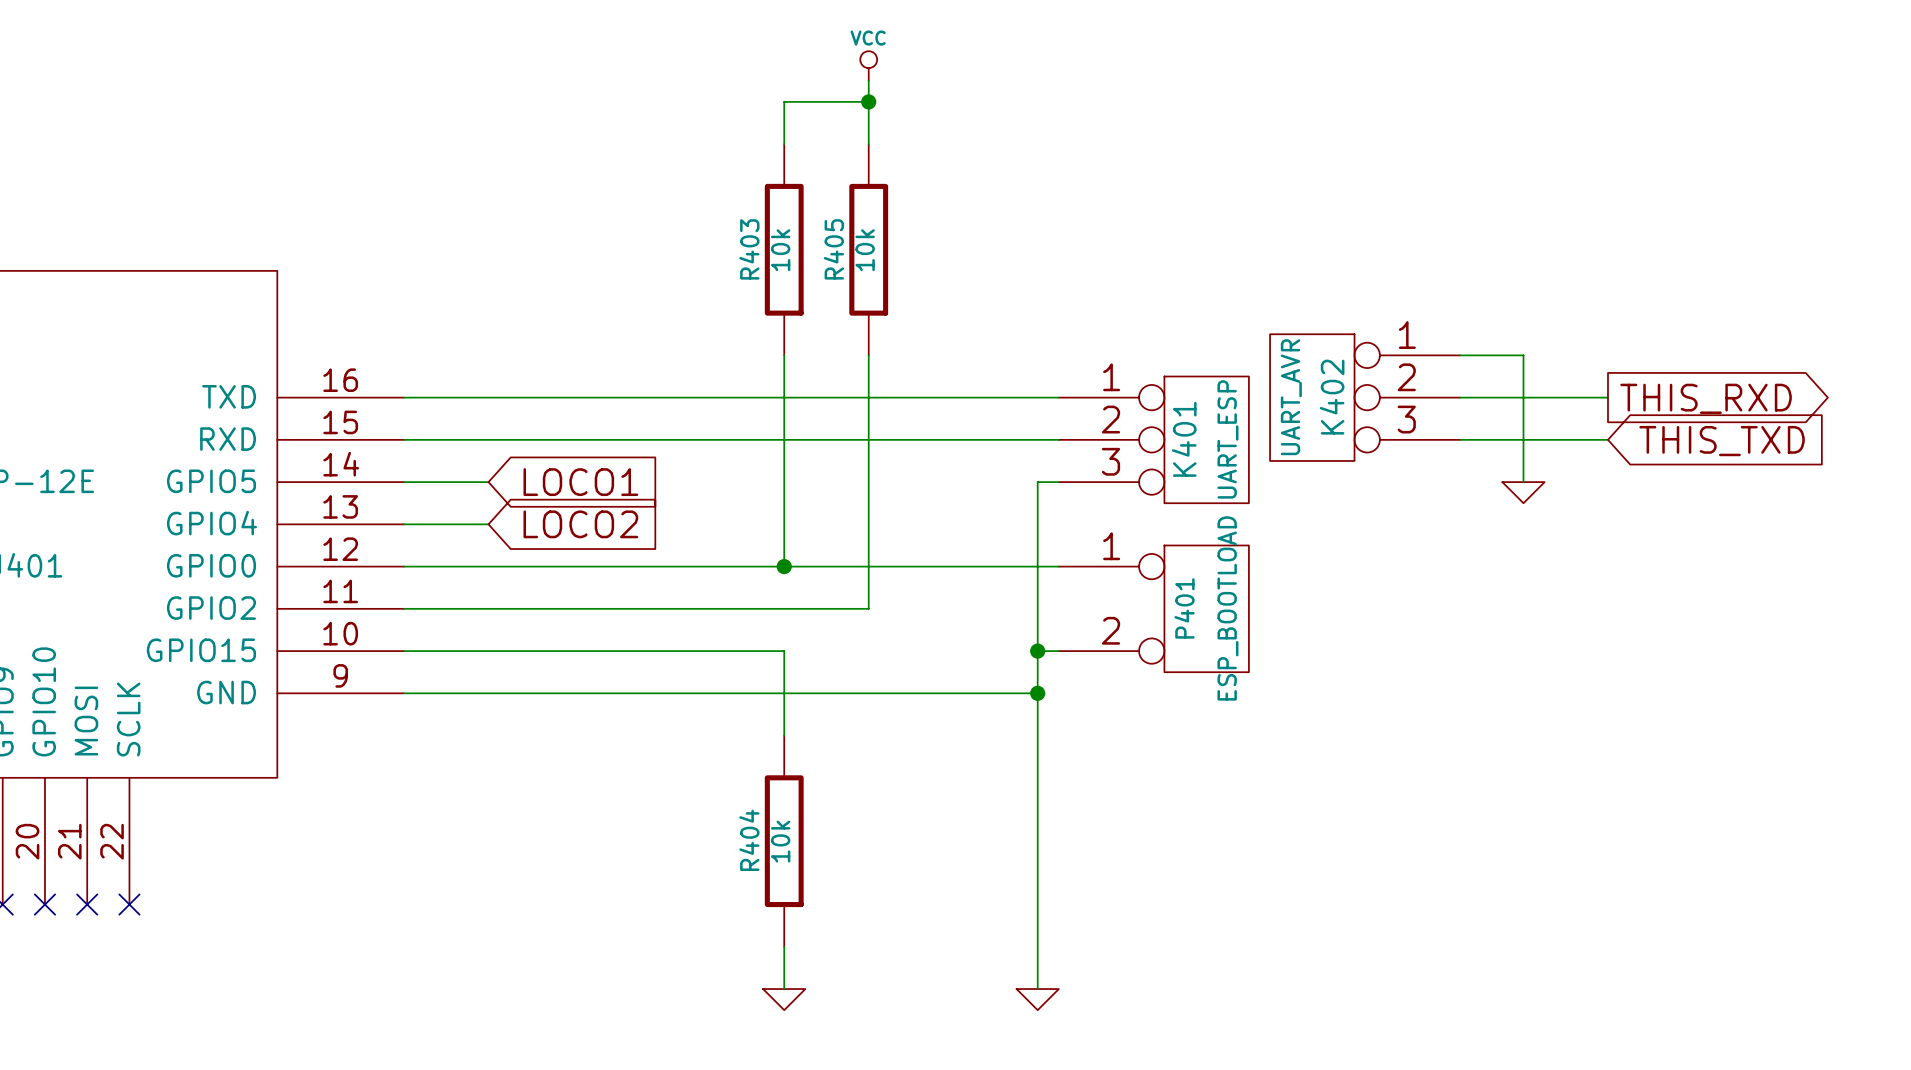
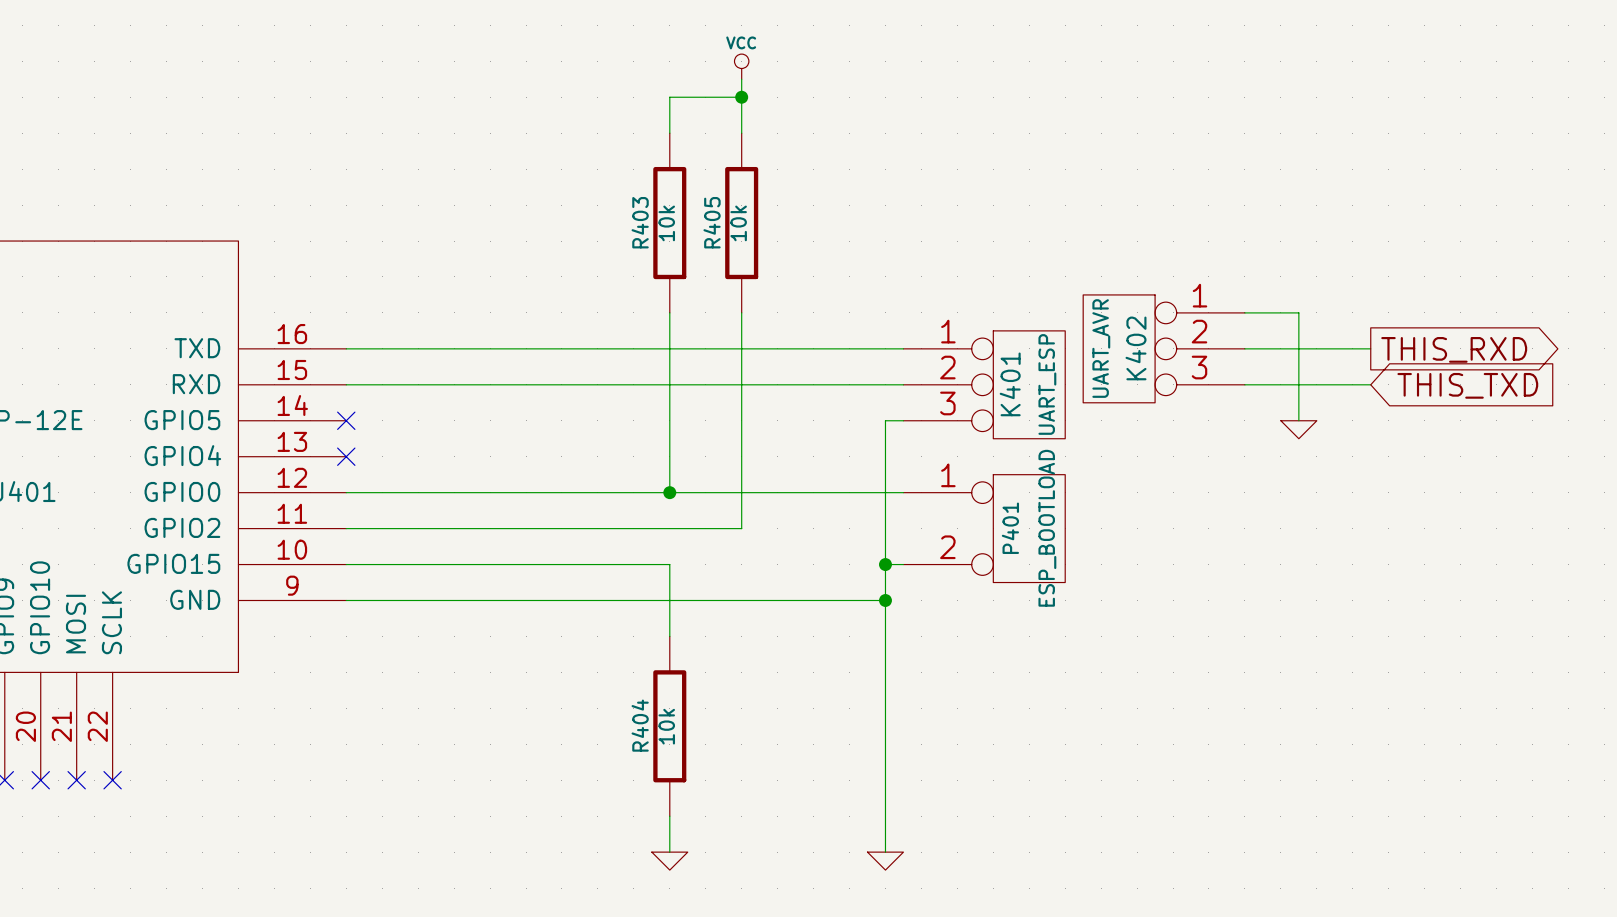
wire: (404, 482) (488, 482) -> none
no-connect mark: none -> (346, 420)
global label: LOCO1 (580, 482) -> none
wire: (404, 524) (488, 524) -> none
no-connect mark: none -> (346, 456)
global label: LOCO2 (580, 524) -> none

